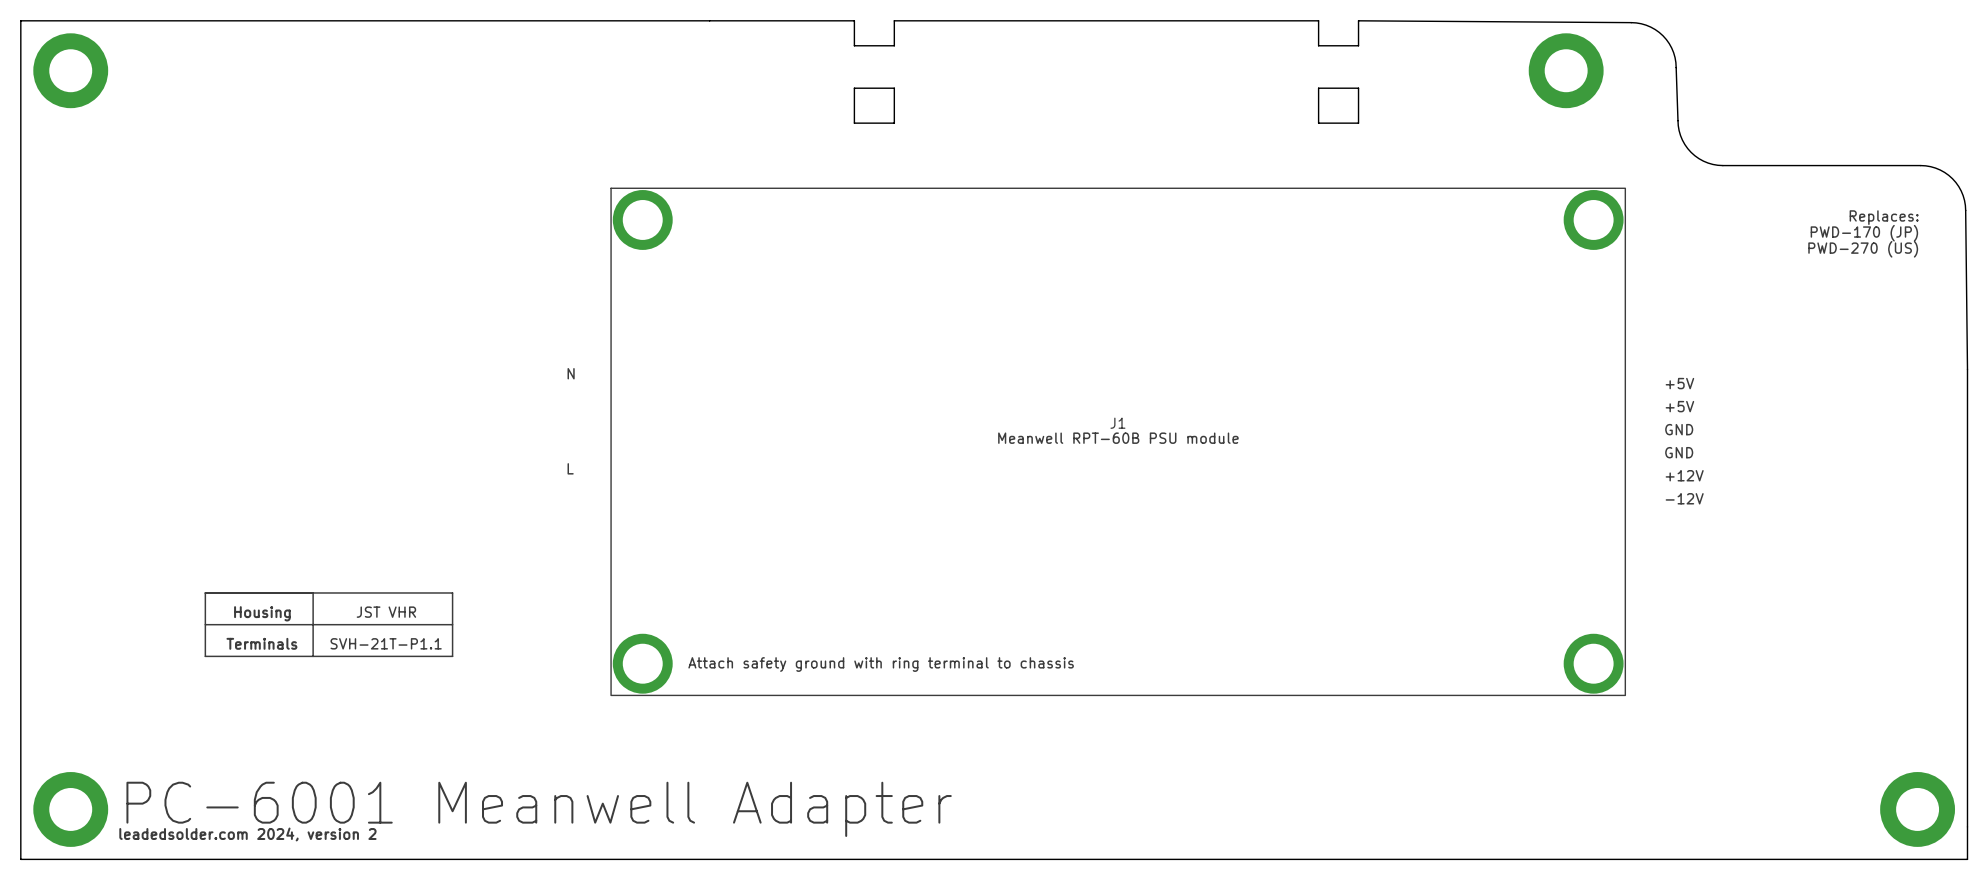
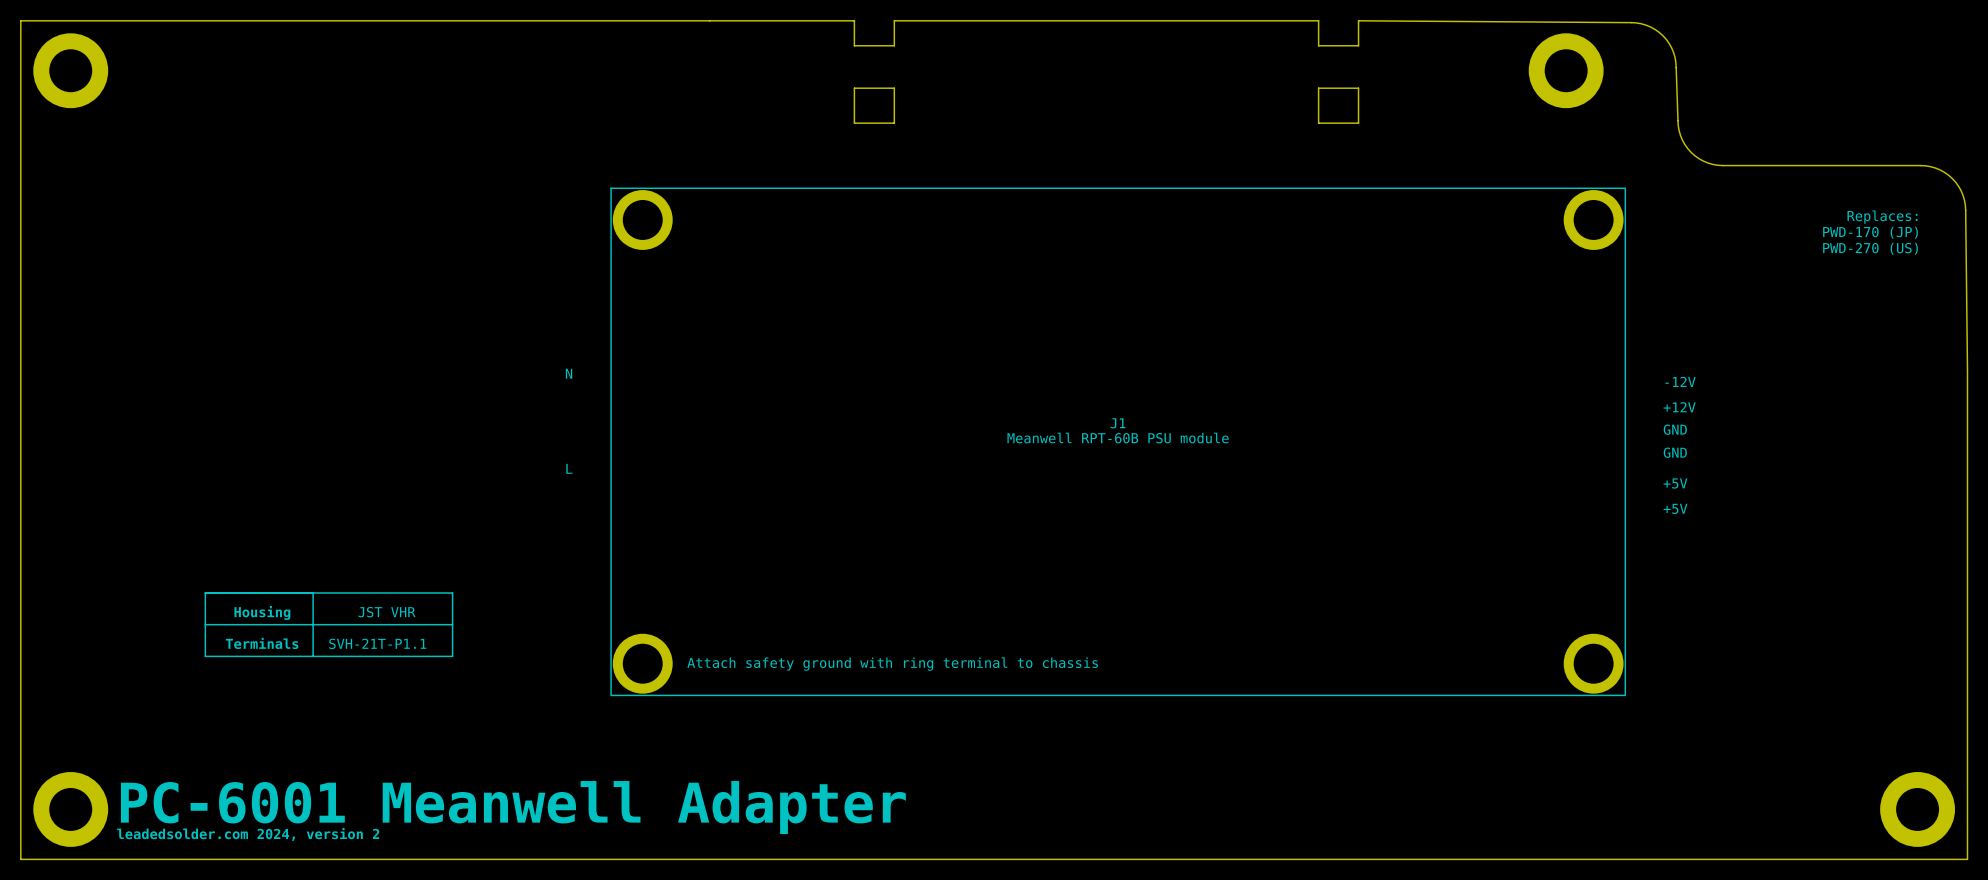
text: +5V (1679, 383) -> none
text: +5V (1679, 406) -> +12V (1679, 407)
text: +12V (1684, 475) -> +5V (1675, 483)
text position: -12V (1684, 498) -> -12V (1680, 381)
text: none -> +5V (1675, 508)

